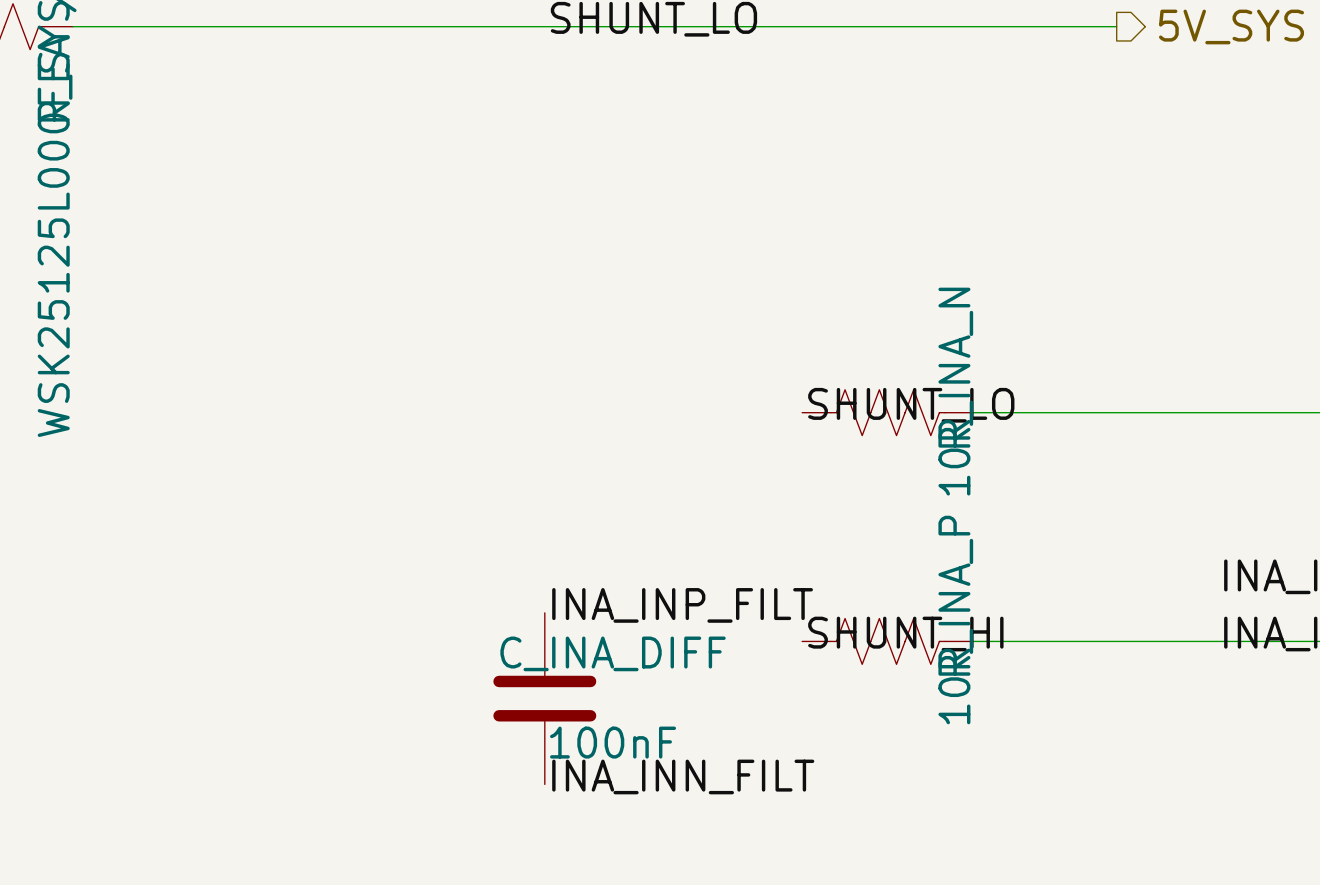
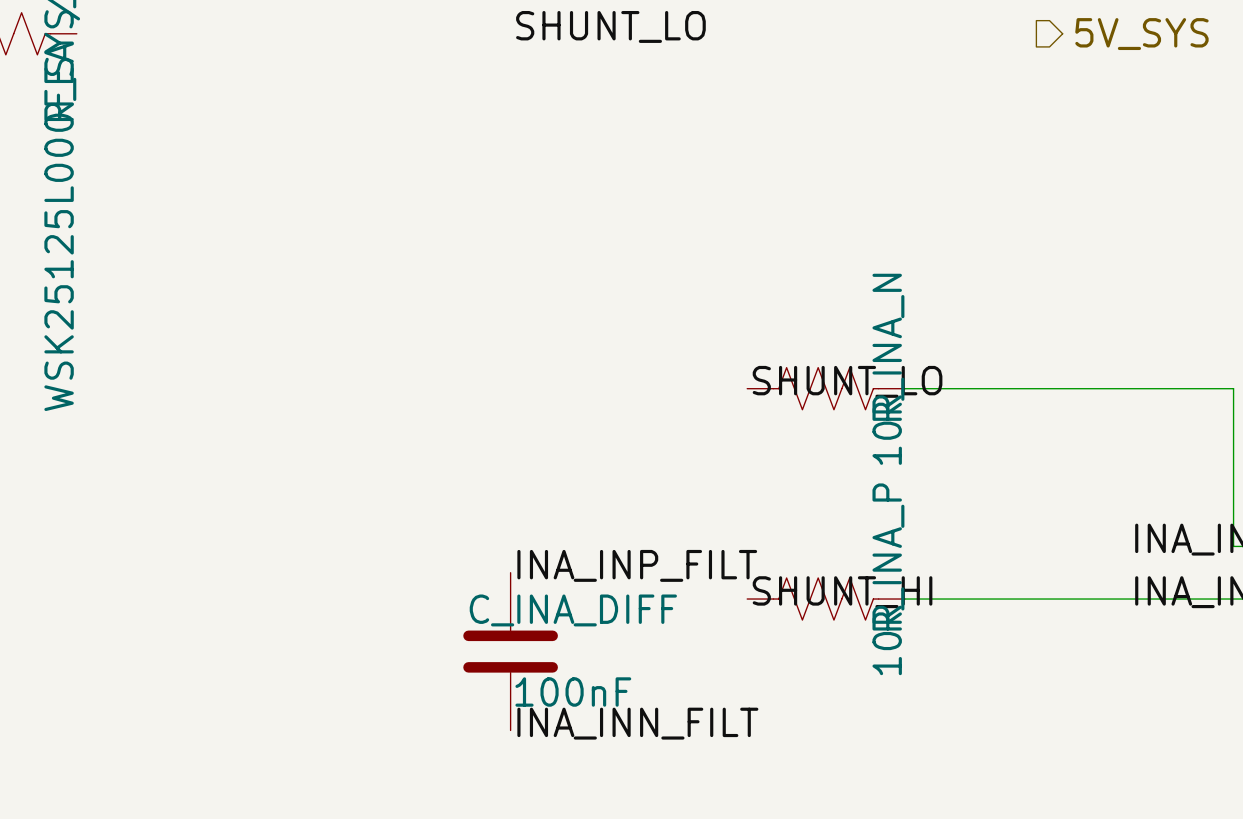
wire: (73, 26) (1116, 26) -> none

